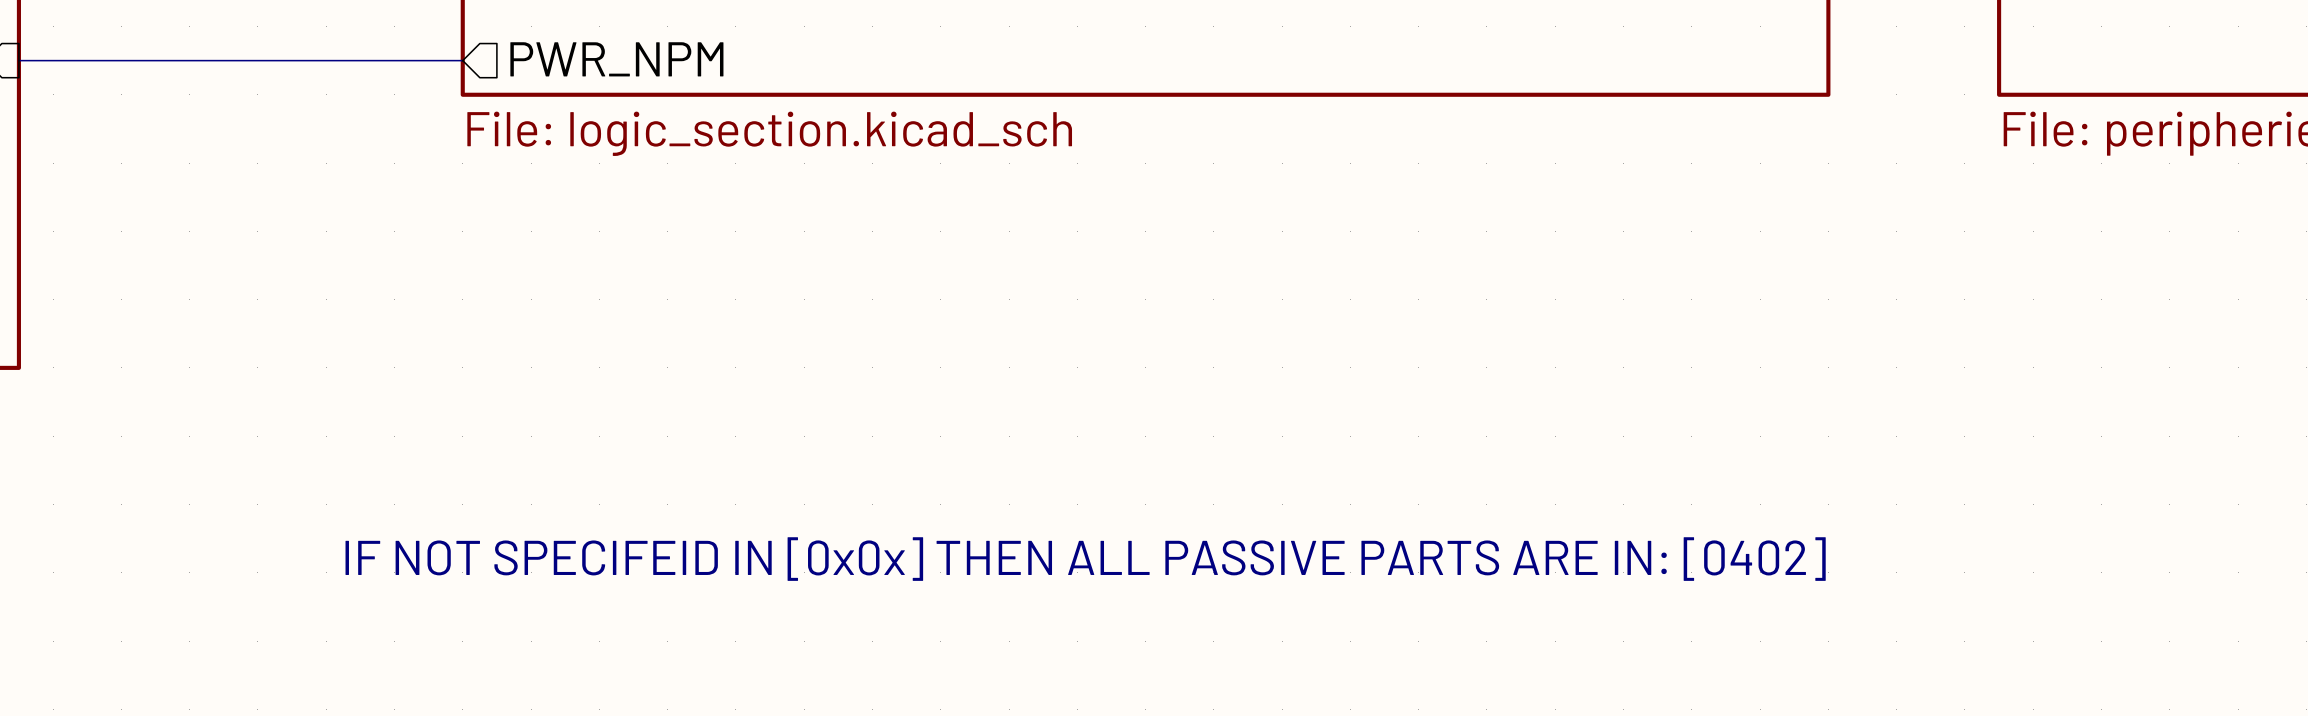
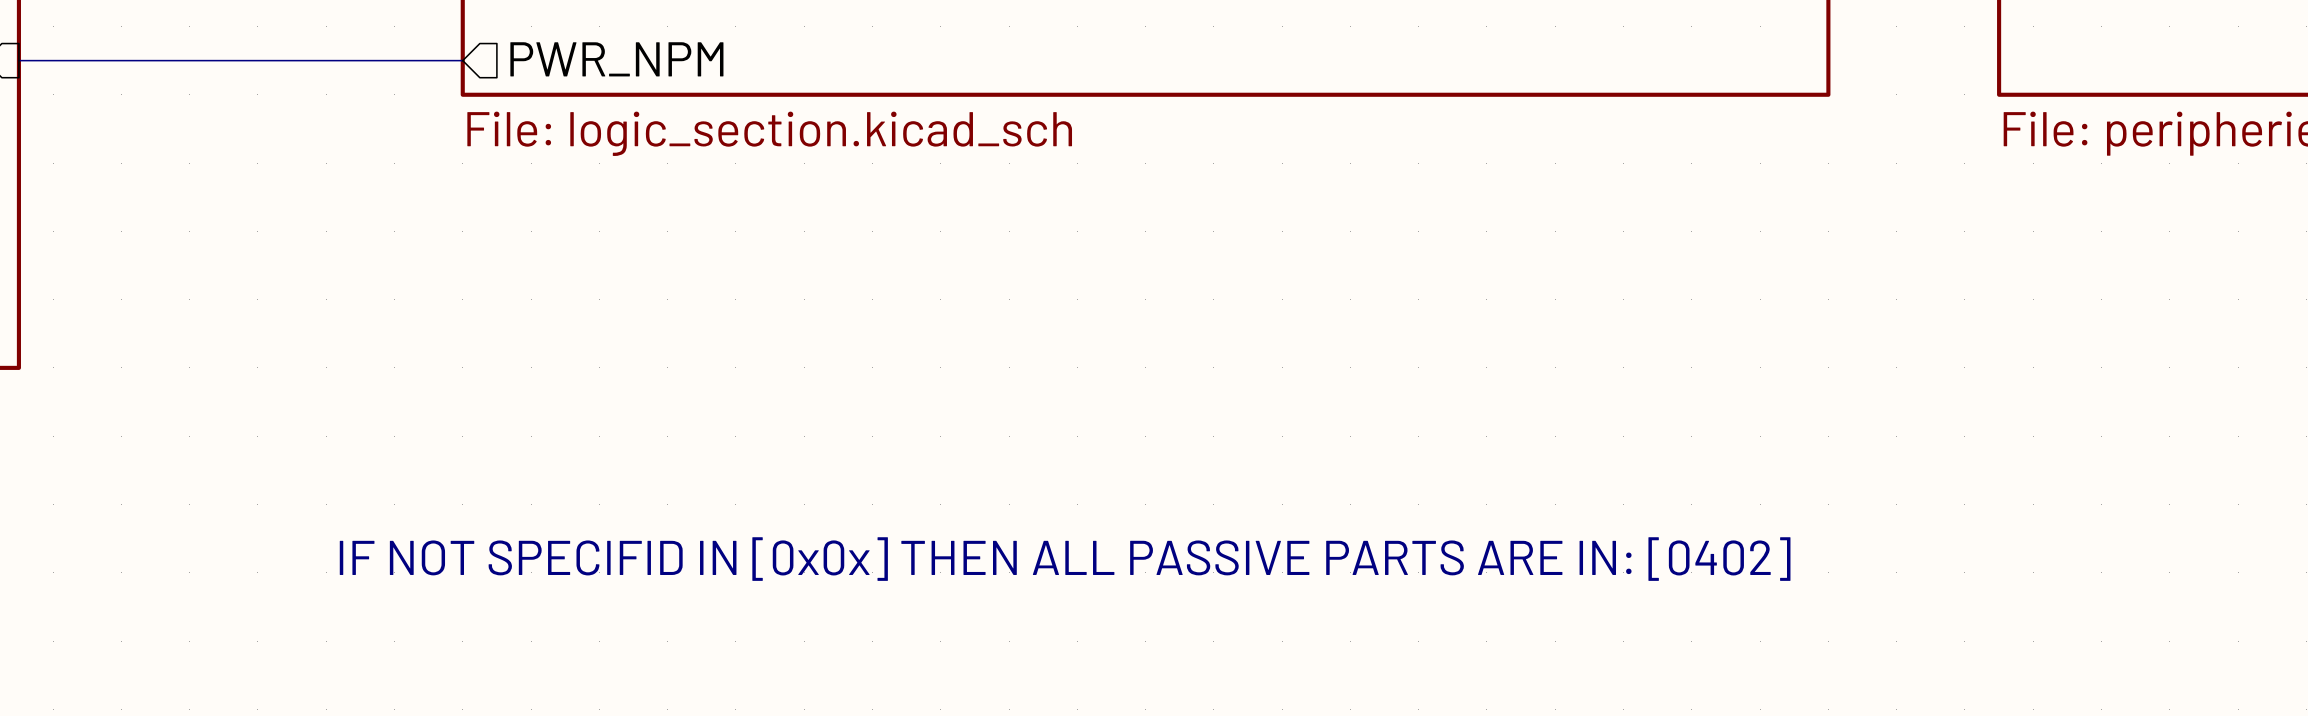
text: IF NOT SPECIFEID IN [0x0x] THEN ALL PASSIVE PARTS ARE IN: [0402] (1085, 559) -> IF NOT SPECIFID IN [0x0x] THEN ALL PASSIVE PARTS ARE IN: [0402] (1065, 559)

